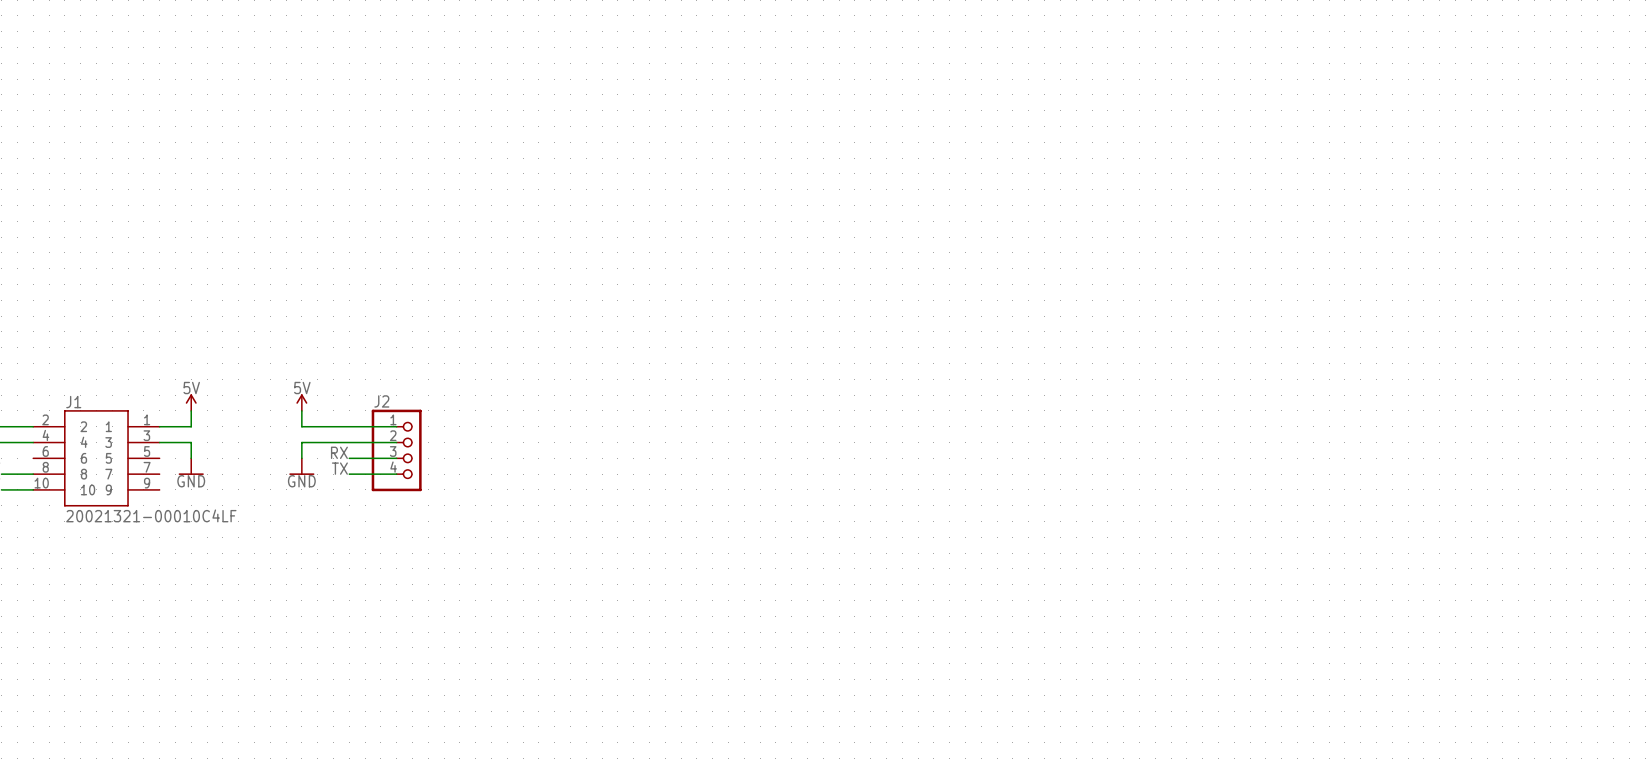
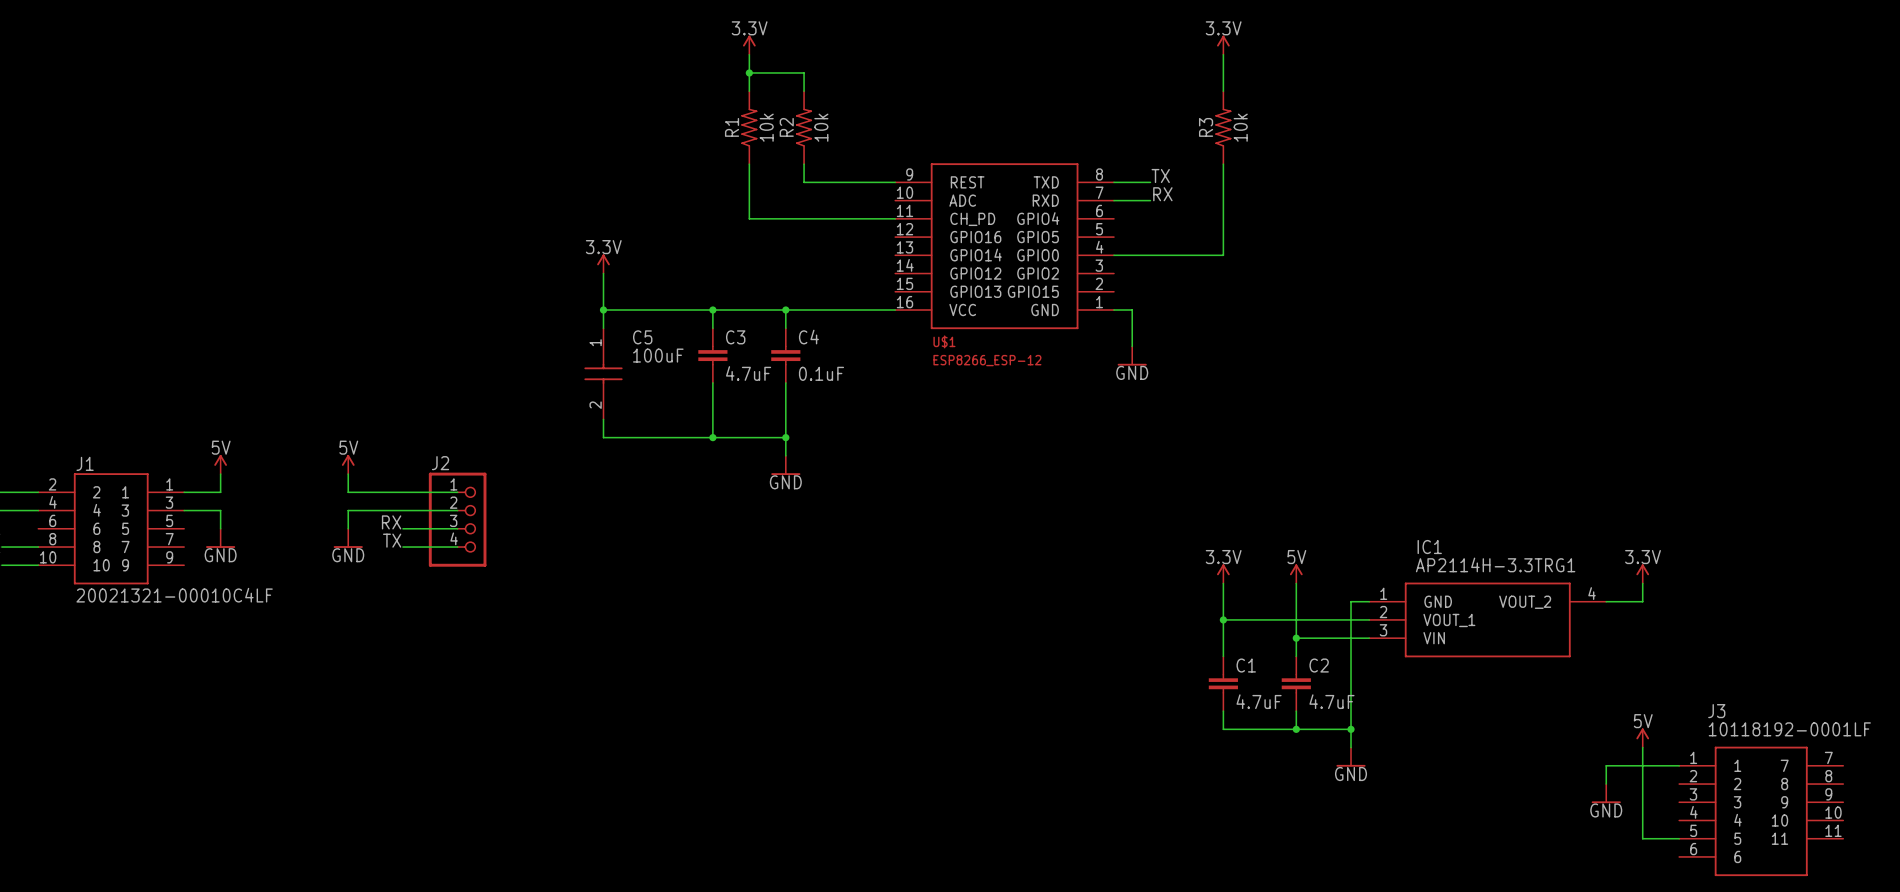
power symbol: none -> 3.3V (749, 45)
power symbol: none -> 3.3V (1223, 45)
wire: none -> (749, 54) (749, 91)
wire: none -> (1223, 54) (1223, 91)
wire: none -> (749, 72) (804, 72) (804, 91)
junction: none -> (749, 72)
R1: none -> 10k (749, 127)
R2: none -> 10k (804, 127)
R3: none -> 10k (1223, 127)
wire: none -> (749, 164) (749, 218) (895, 218)
wire: none -> (804, 164) (804, 182) (895, 182)
wire: none -> (1223, 164) (1223, 255) (1113, 255)
label: none -> TX (1160, 176)
wire: none -> (1113, 182) (1150, 182)
label: none -> RX (1162, 194)
wire: none -> (1113, 200) (1150, 200)
U$1: none -> (1004, 246)
power symbol: none -> 3.3V (603, 263)
wire: none -> (603, 273) (603, 328)
wire: none -> (603, 310) (895, 310)
junction: none -> (603, 310)
wire: none -> (712, 310) (712, 328)
junction: none -> (712, 310)
wire: none -> (785, 310) (785, 328)
junction: none -> (785, 310)
wire: none -> (1113, 310) (1132, 310) (1132, 346)
C3: none -> 4.7uF (712, 355)
C4: none -> 0.1uF (785, 355)
power symbol: none -> GND (1132, 356)
C5: none -> 100uF (603, 373)
wire: none -> (712, 382) (712, 437)
wire: none -> (785, 382) (785, 455)
wire: none -> (603, 419) (603, 437) (785, 437)
junction: none -> (712, 437)
junction: none -> (785, 437)
power symbol: none -> GND (785, 465)
power symbol: none -> 3.3V (1223, 573)
power symbol: none -> 5V (1296, 573)
power symbol: none -> 3.3V (1642, 573)
wire: none -> (1223, 583) (1223, 656)
wire: none -> (1296, 583) (1296, 656)
wire: none -> (1642, 583) (1642, 601) (1606, 601)
wire: none -> (1369, 601) (1351, 601) (1351, 747)
wire: none -> (1223, 619) (1369, 619)
junction: none -> (1223, 619)
IC1: none -> AP2114H-3.3TRG1 (1487, 619)
wire: none -> (1296, 638) (1369, 638)
junction: none -> (1296, 638)
C1: none -> 4.7uF (1223, 683)
C2: none -> 4.7uF (1296, 683)
wire: none -> (1223, 711) (1223, 729) (1351, 729)
wire: none -> (1296, 711) (1296, 729)
junction: none -> (1296, 729)
junction: none -> (1351, 729)
power symbol: none -> 5V (1642, 738)
wire: none -> (1642, 747) (1642, 838) (1679, 838)
power symbol: none -> GND (1351, 757)
wire: none -> (1679, 765) (1606, 765) (1606, 784)
power symbol: none -> GND (1606, 793)
J3: none -> 10118192-0001LF (1761, 811)

